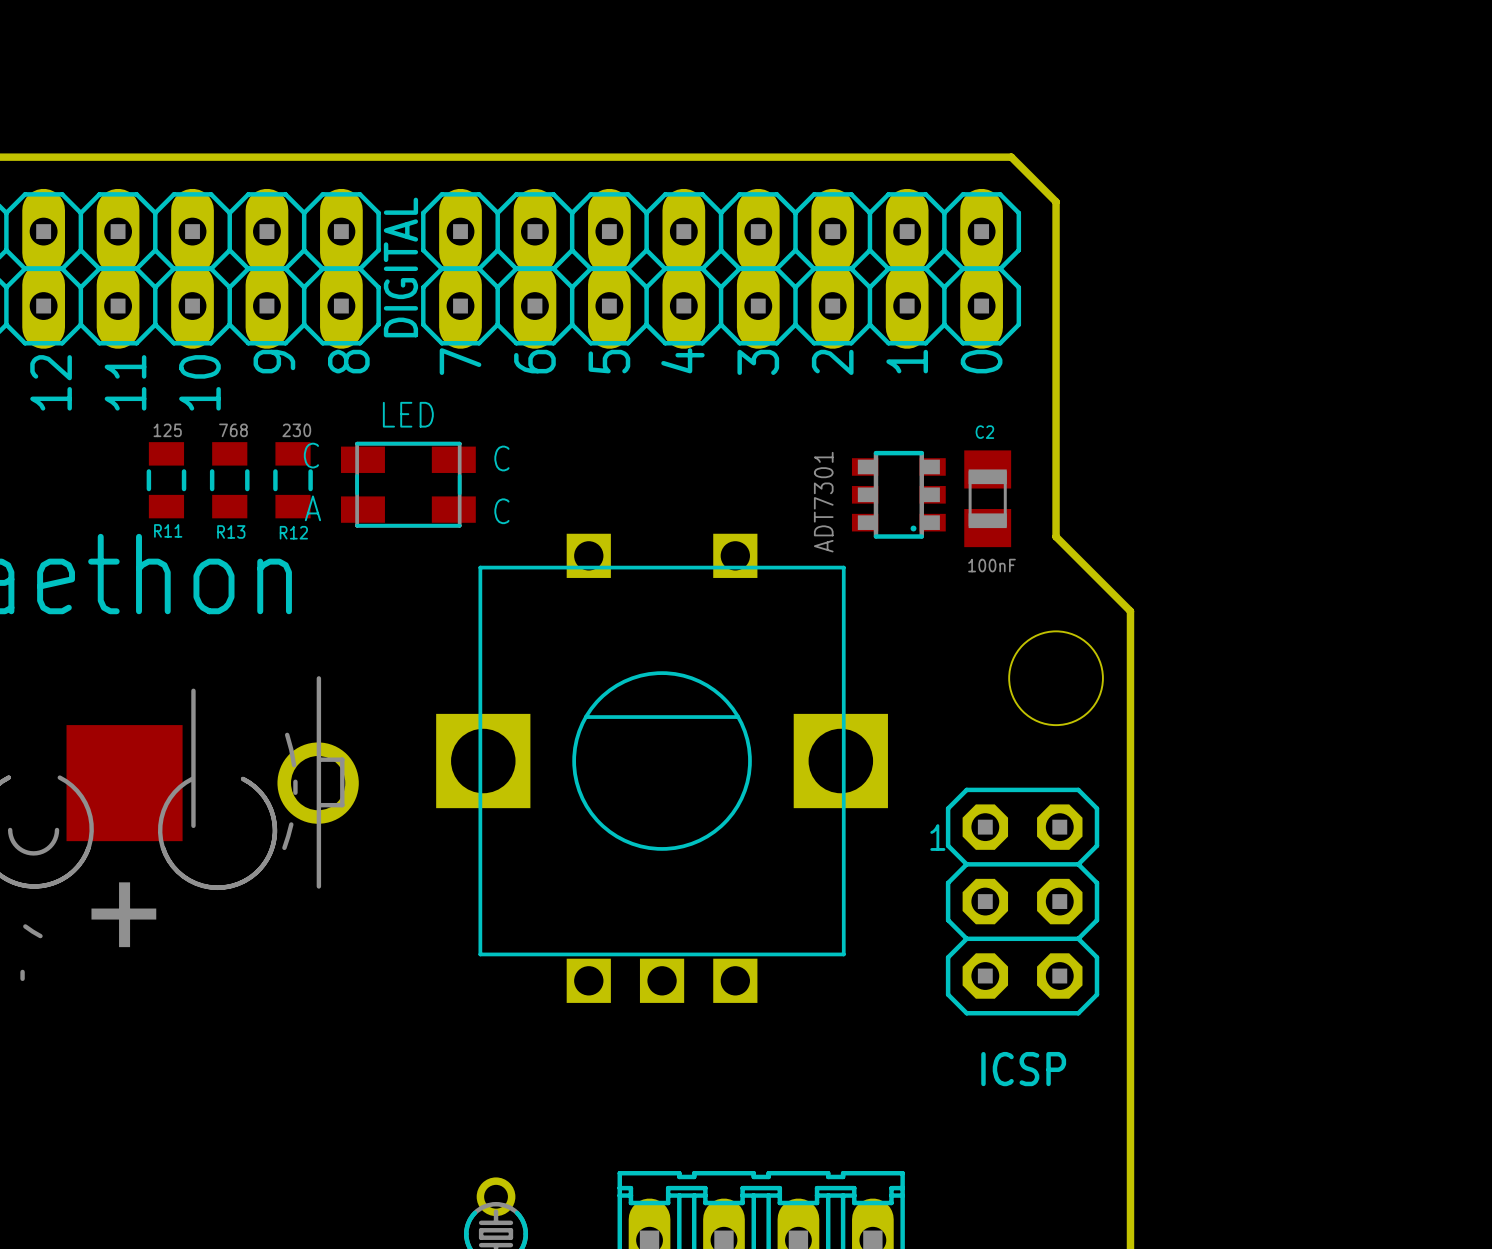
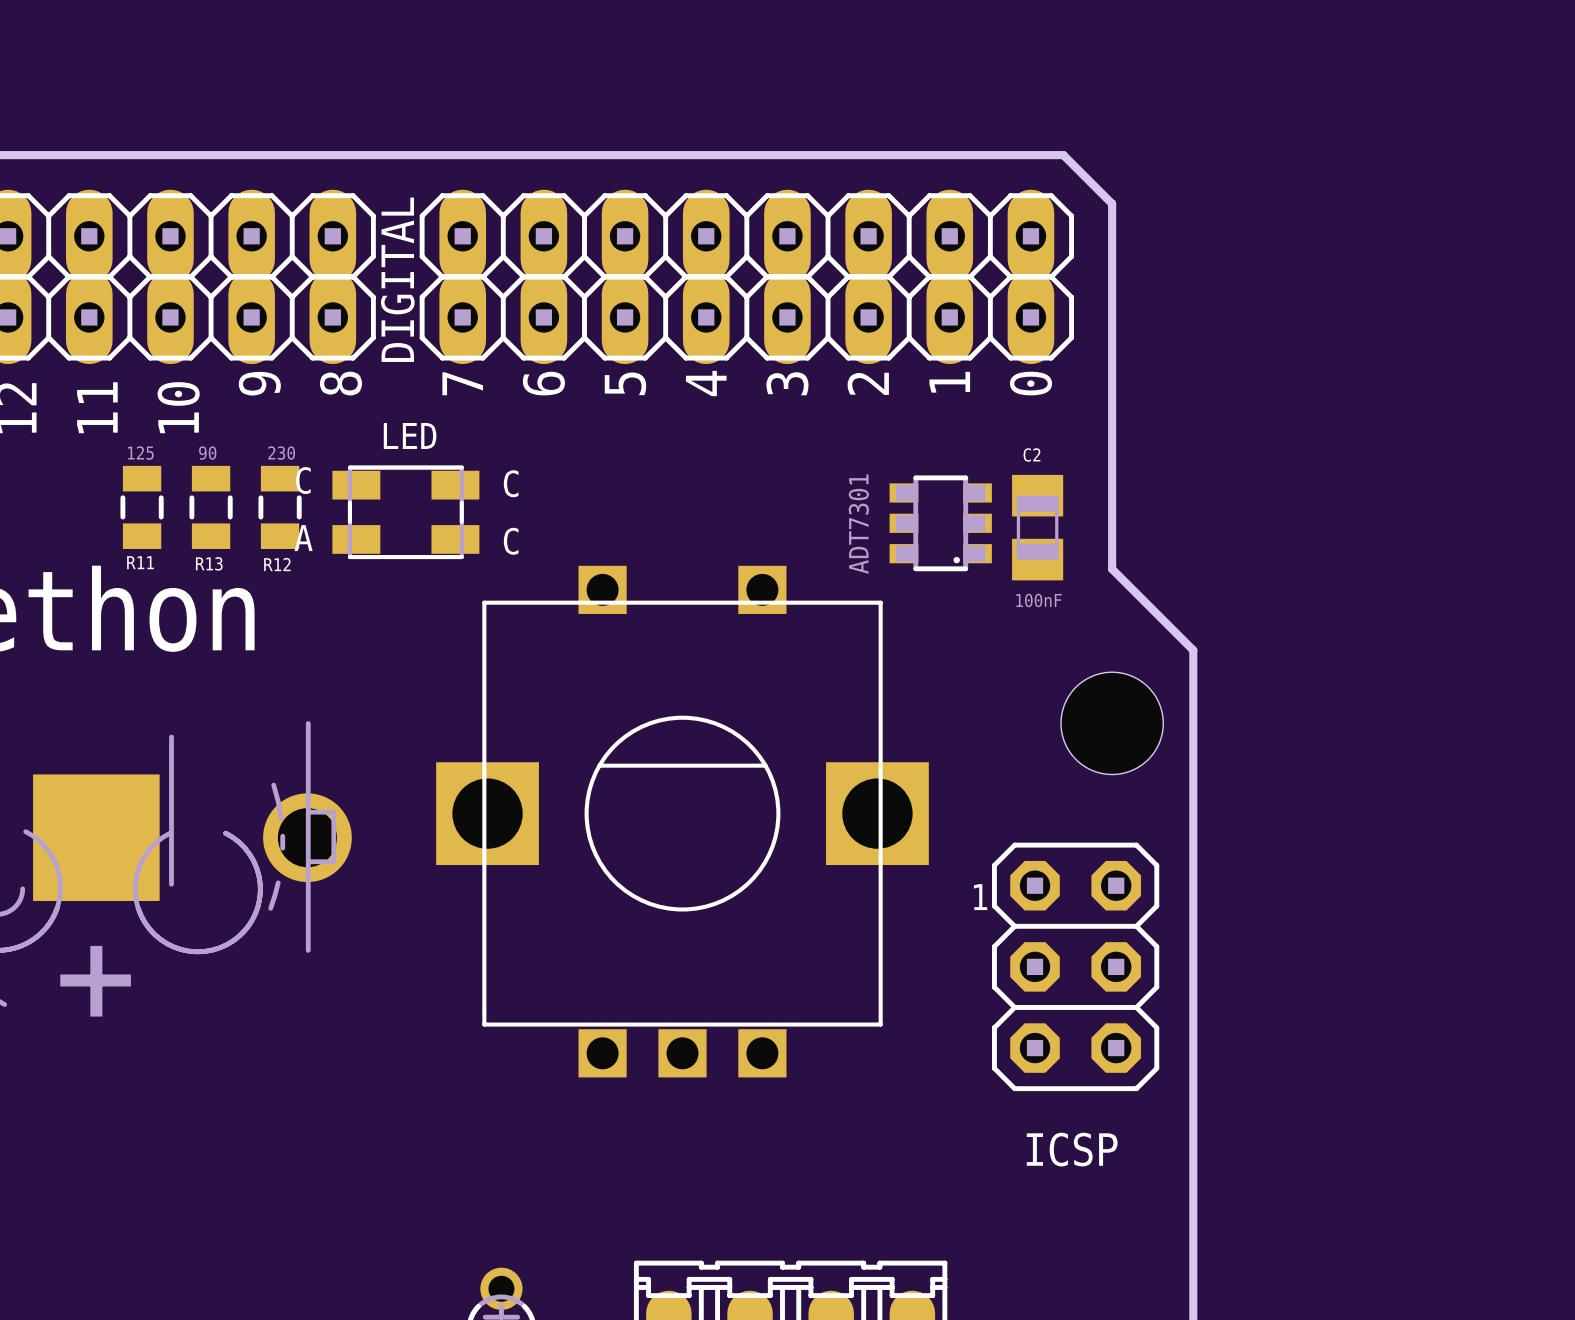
R13 value: 768 (233, 430) -> 90 (207, 453)

